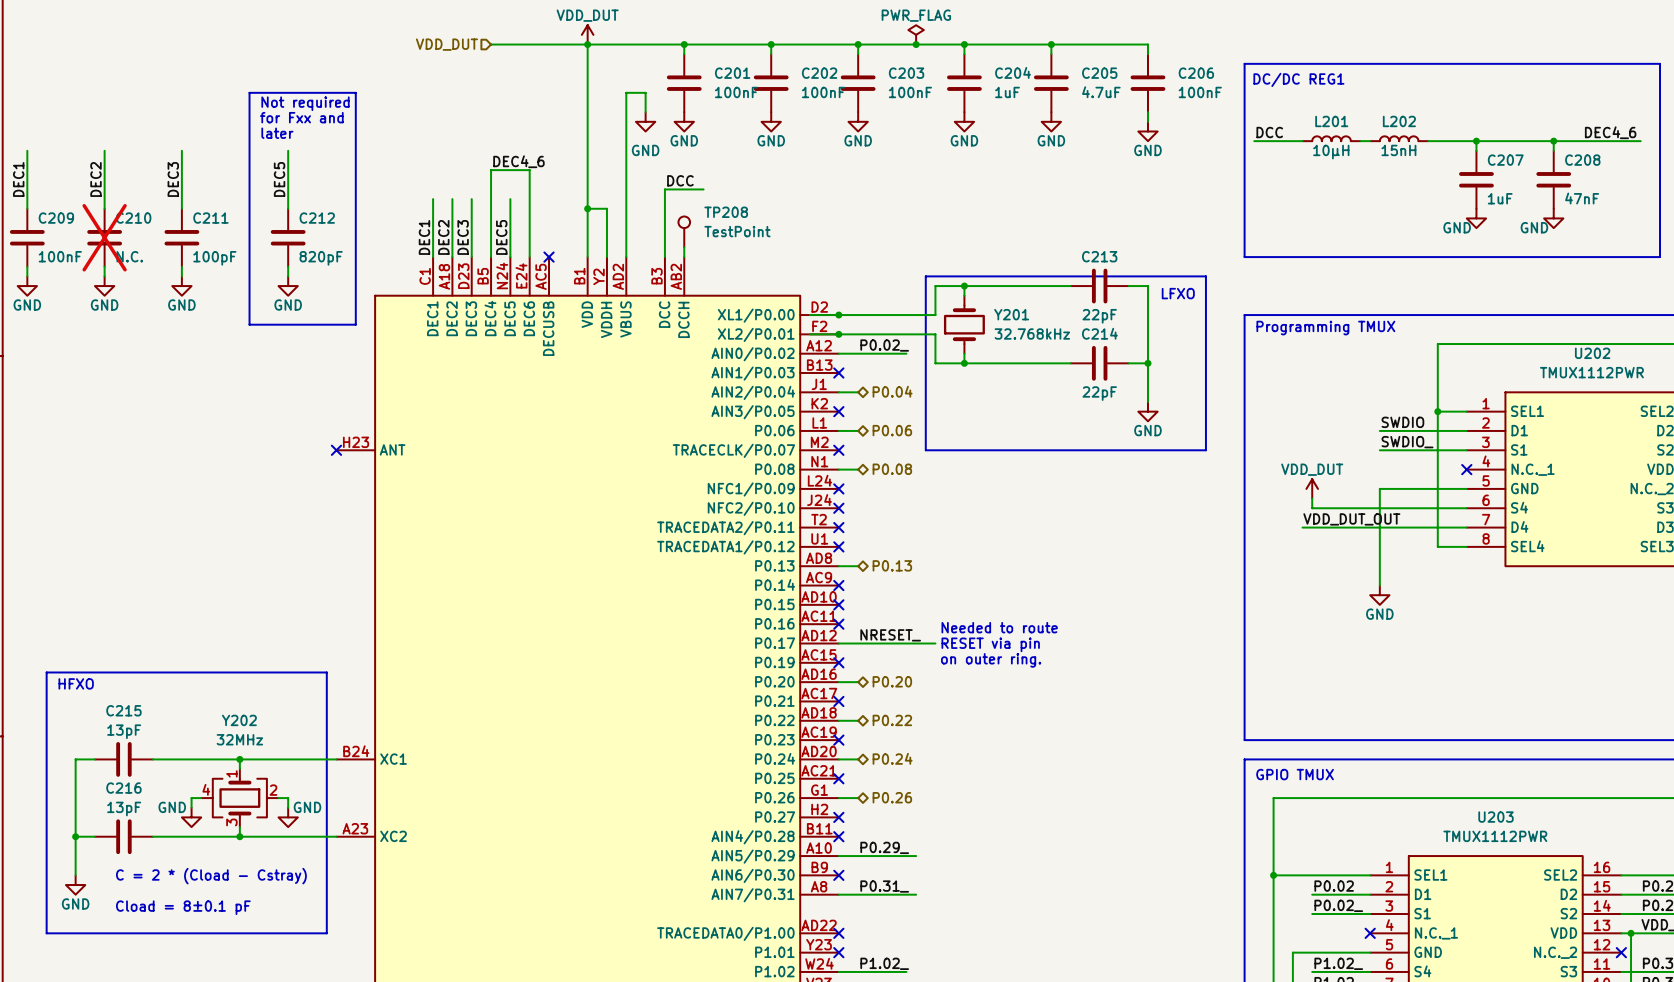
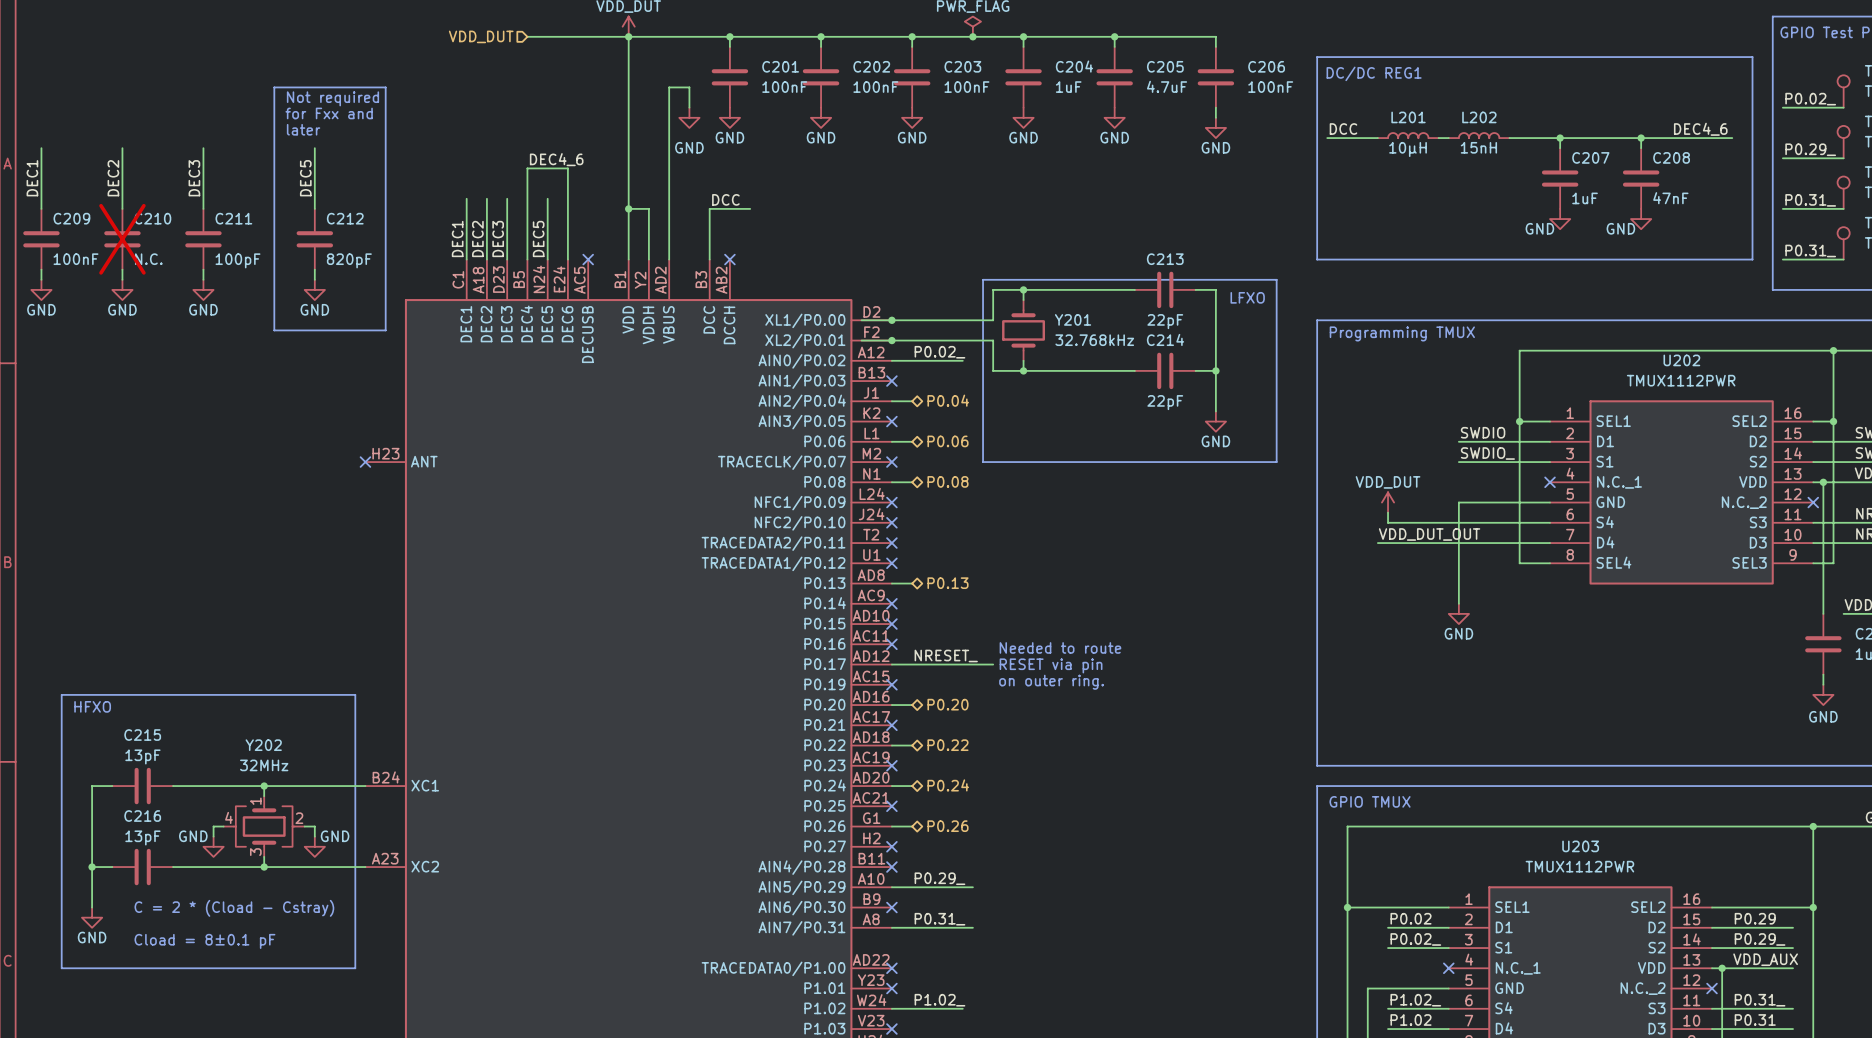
label position: DCC (680, 180) -> DCC (725, 199)
wire: (703, 189) (664, 189) (664, 208) -> (750, 208) (709, 208)
TP208: TestPoint (684, 231) -> none
wire: (684, 247) (684, 257) -> none
no-connect mark: none -> (729, 259)

